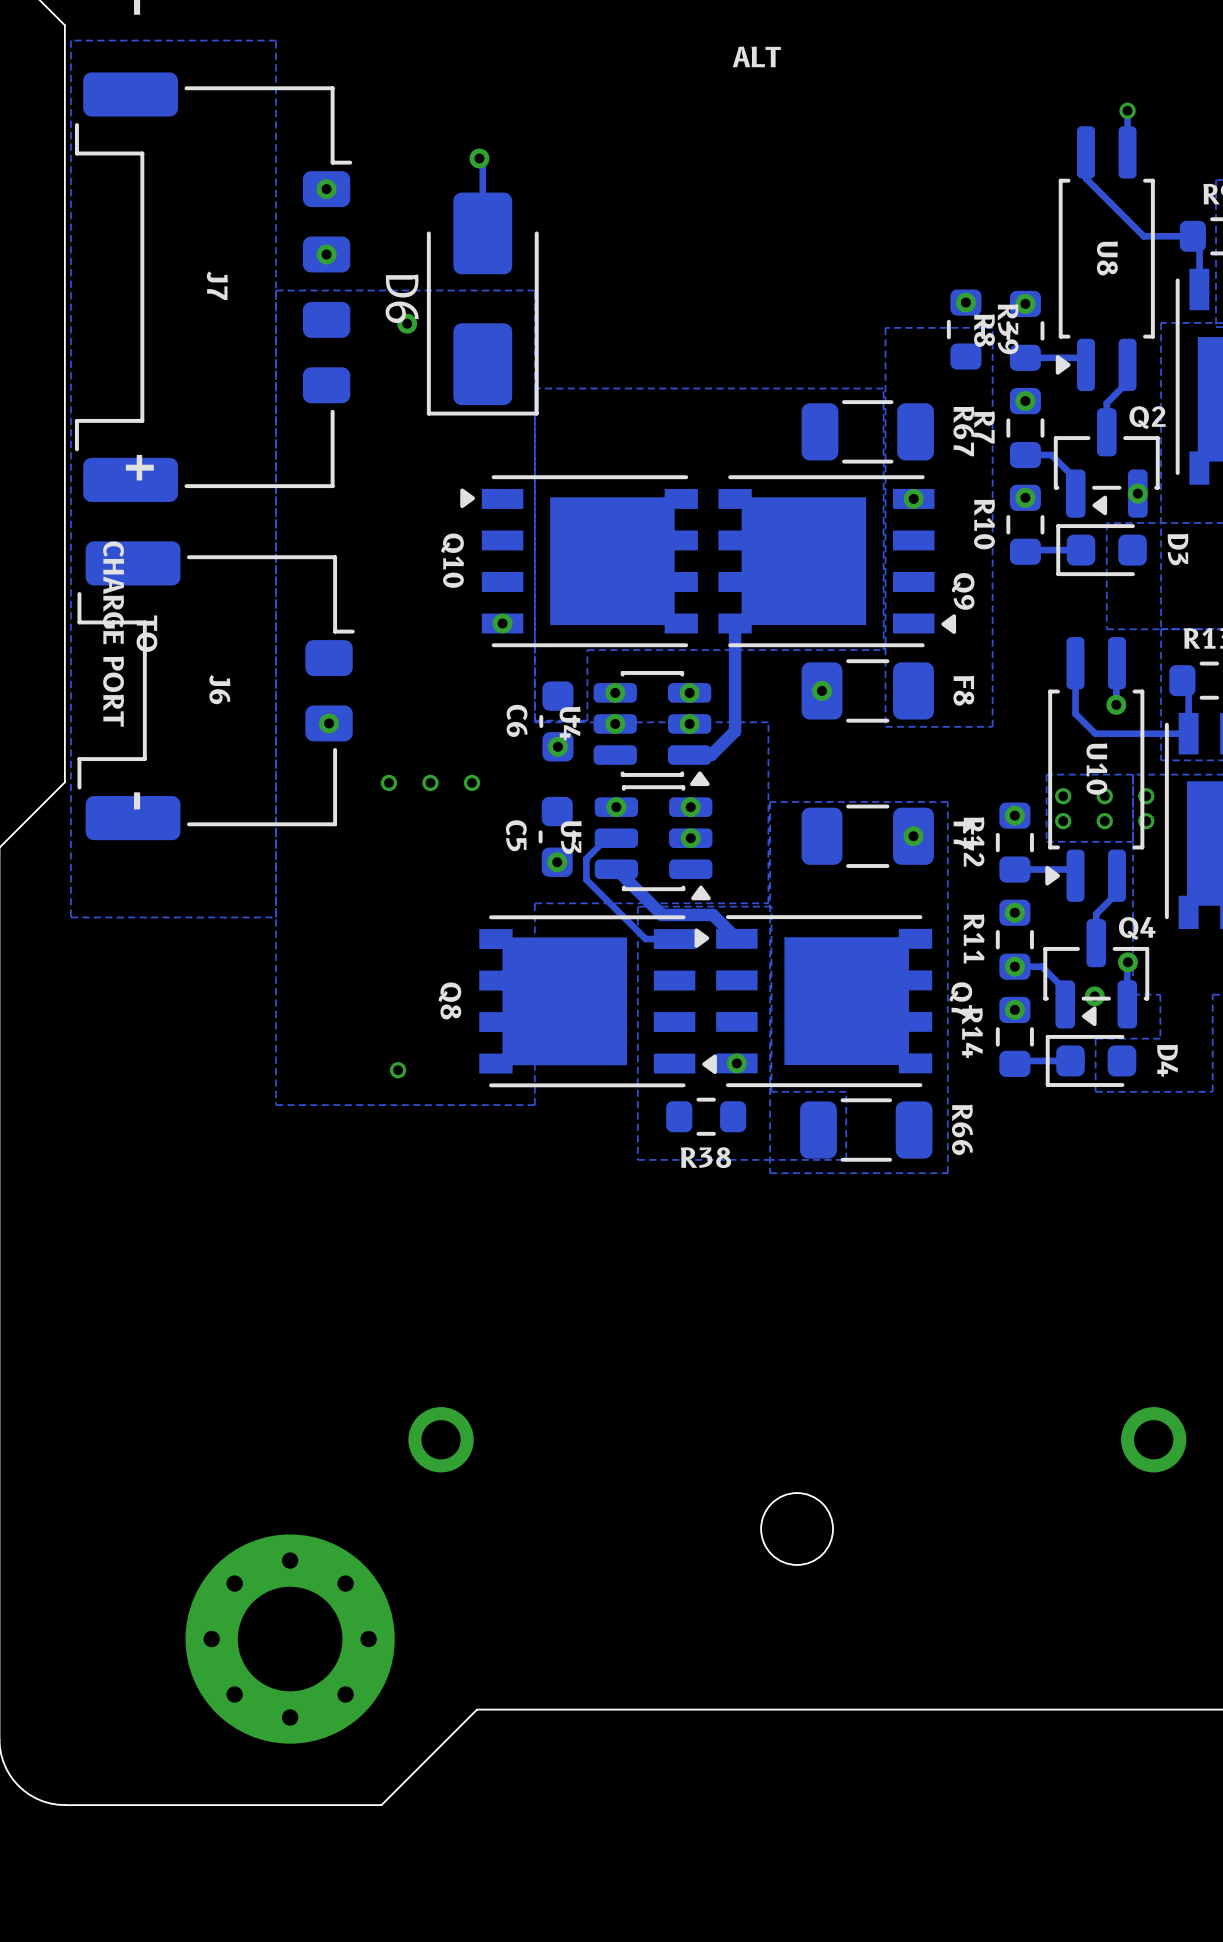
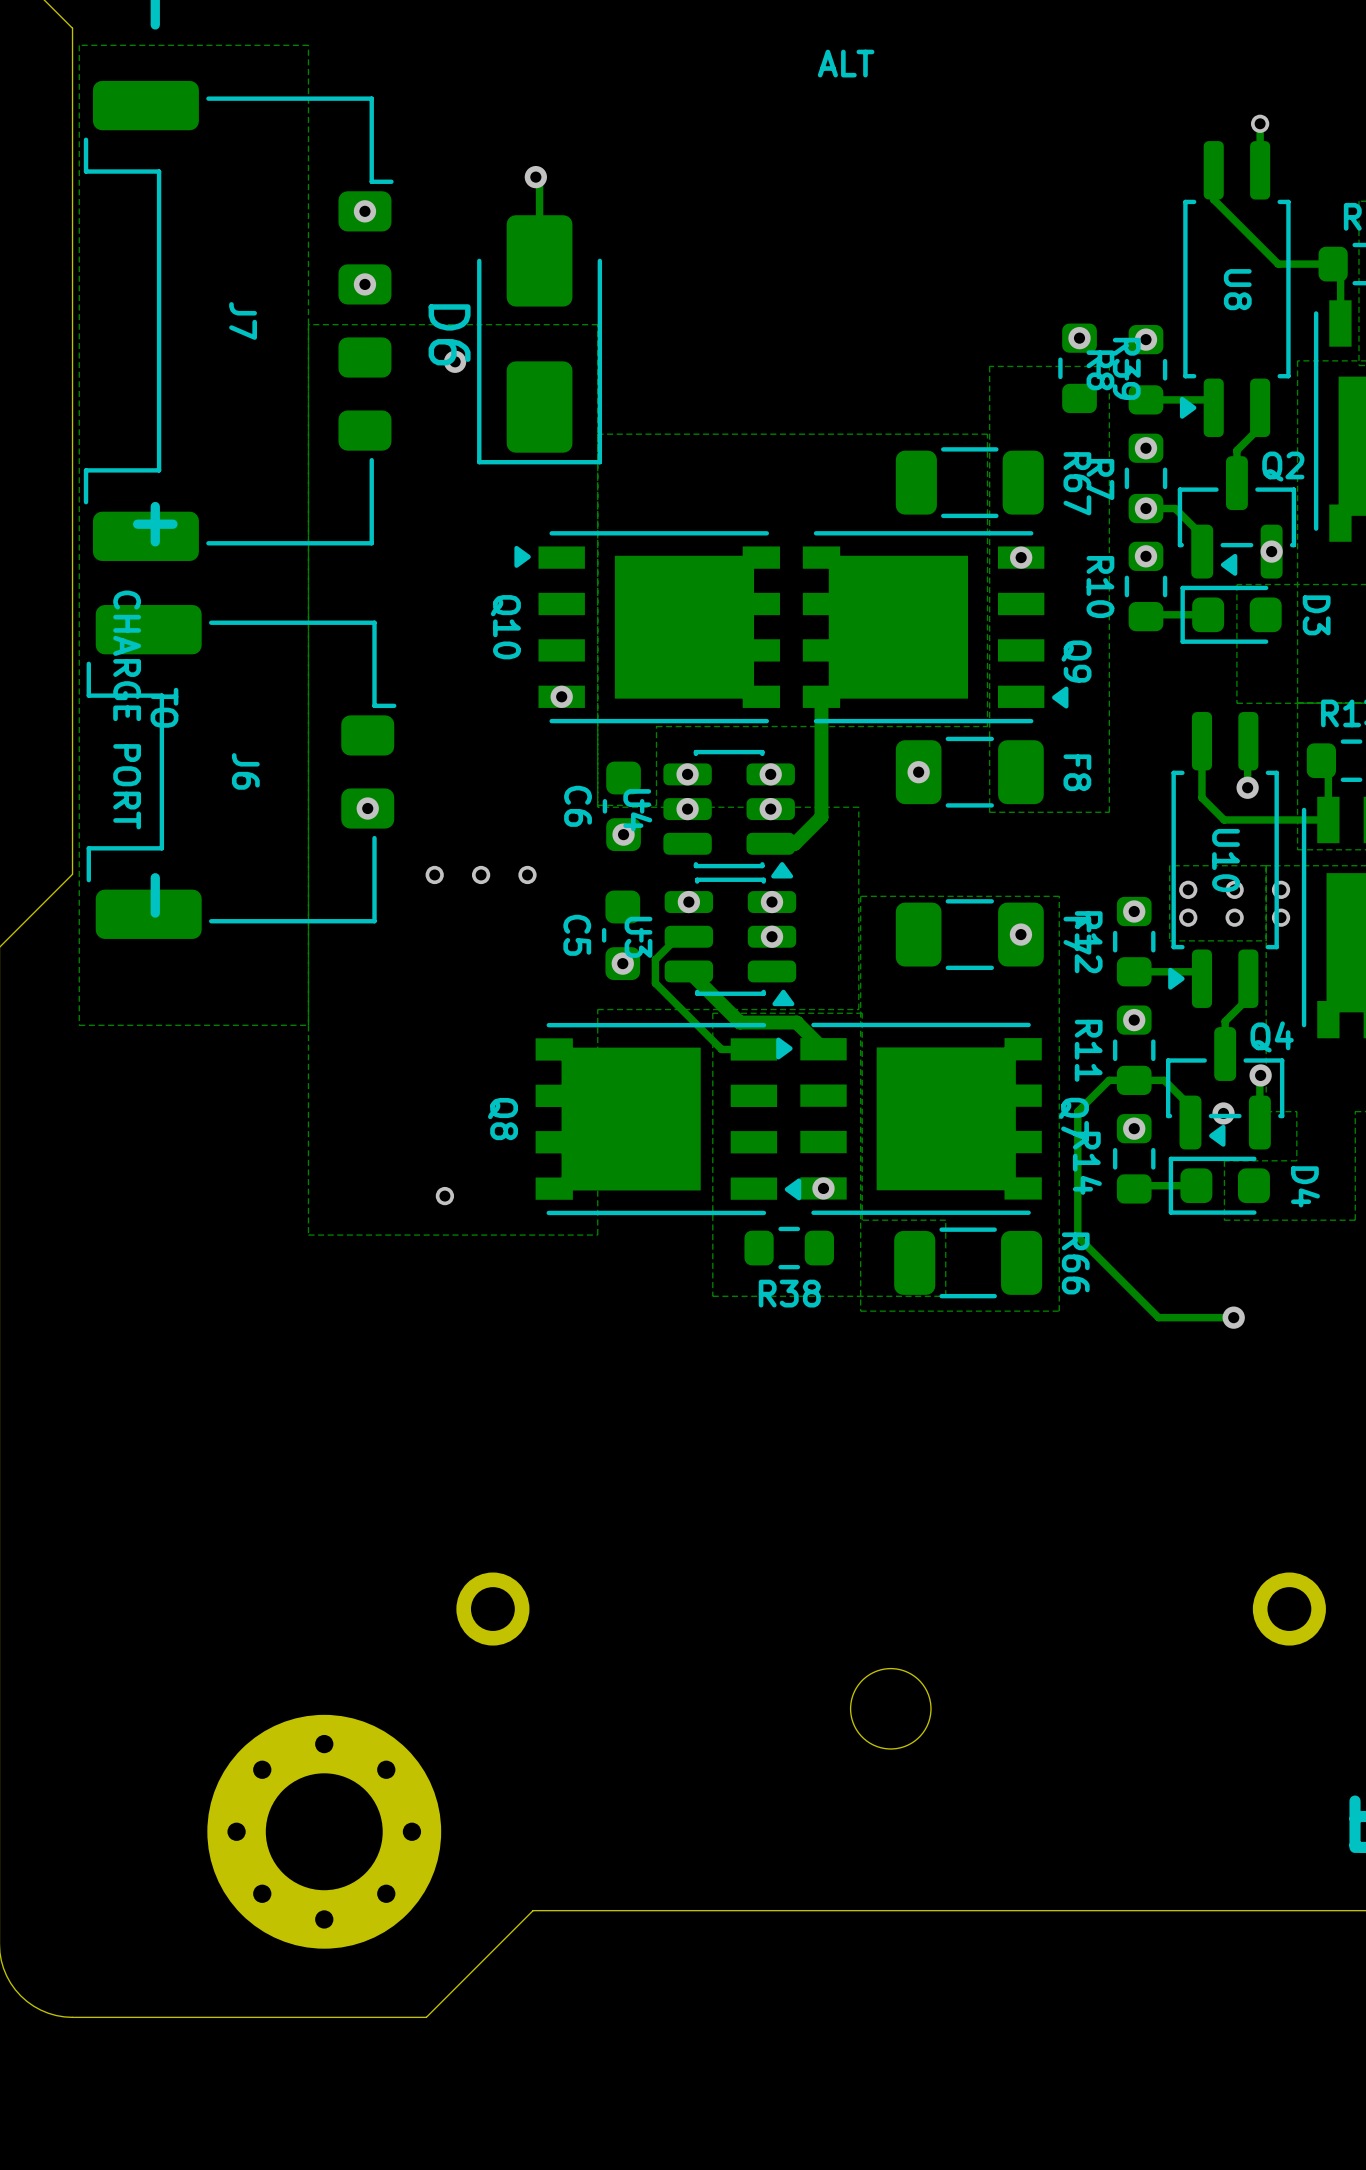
via: none -> (1145, 508)
track: none -> (1134, 1080) (1109, 1080) (1077, 1111) (1077, 1236) (1158, 1317) (1233, 1317)
via: (1014, 966) -> none
via: none -> (1233, 1317)

